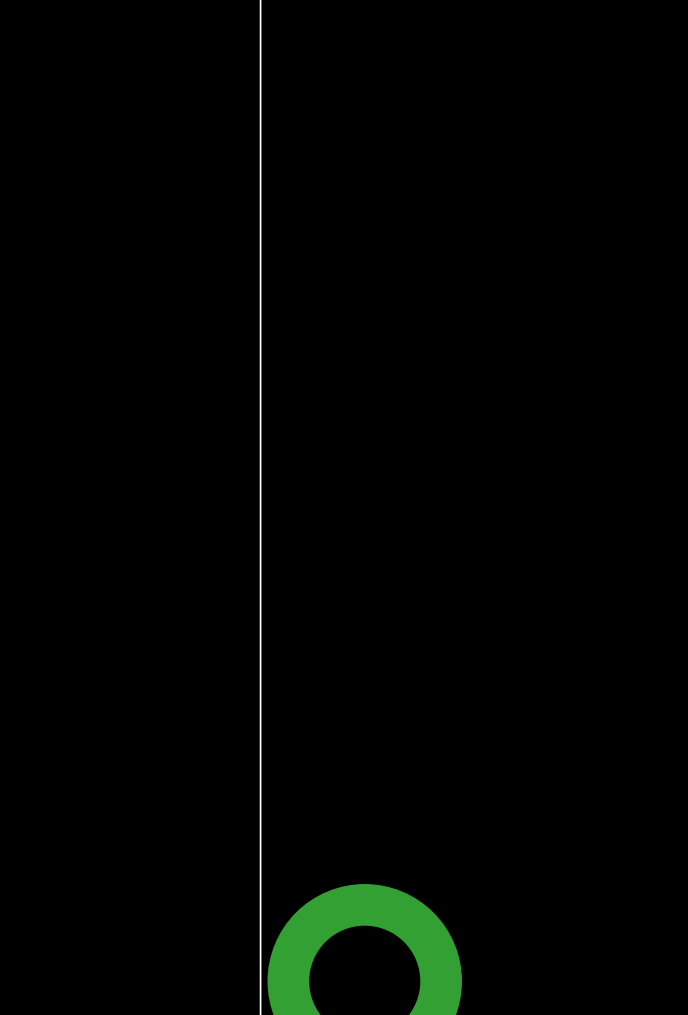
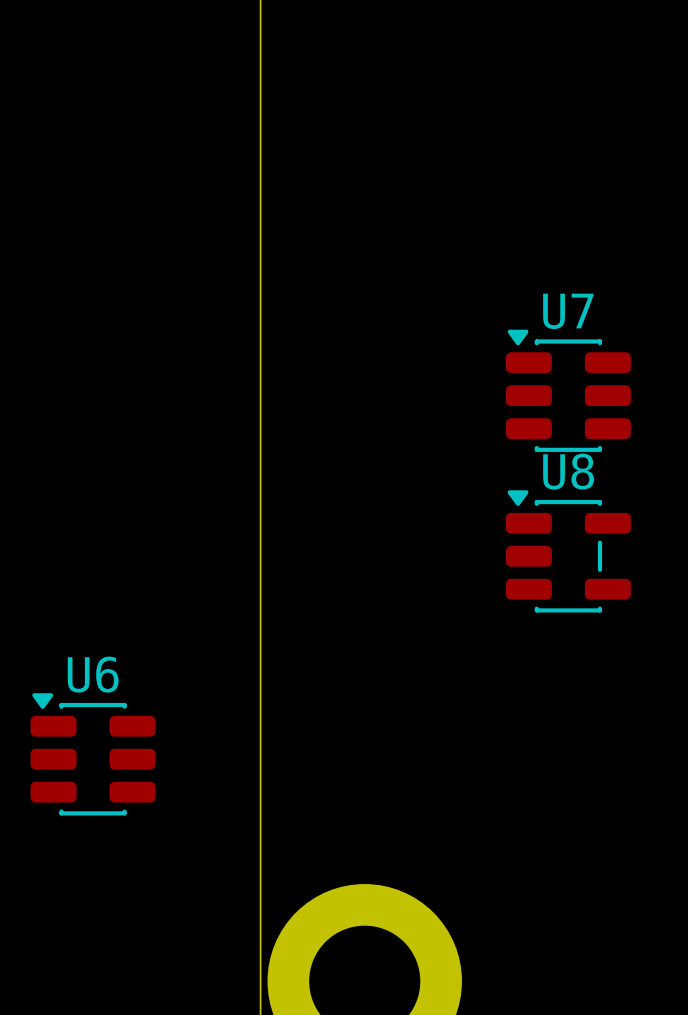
U7: none -> (568, 390)
U8: none -> (568, 551)
U6: none -> (93, 754)

